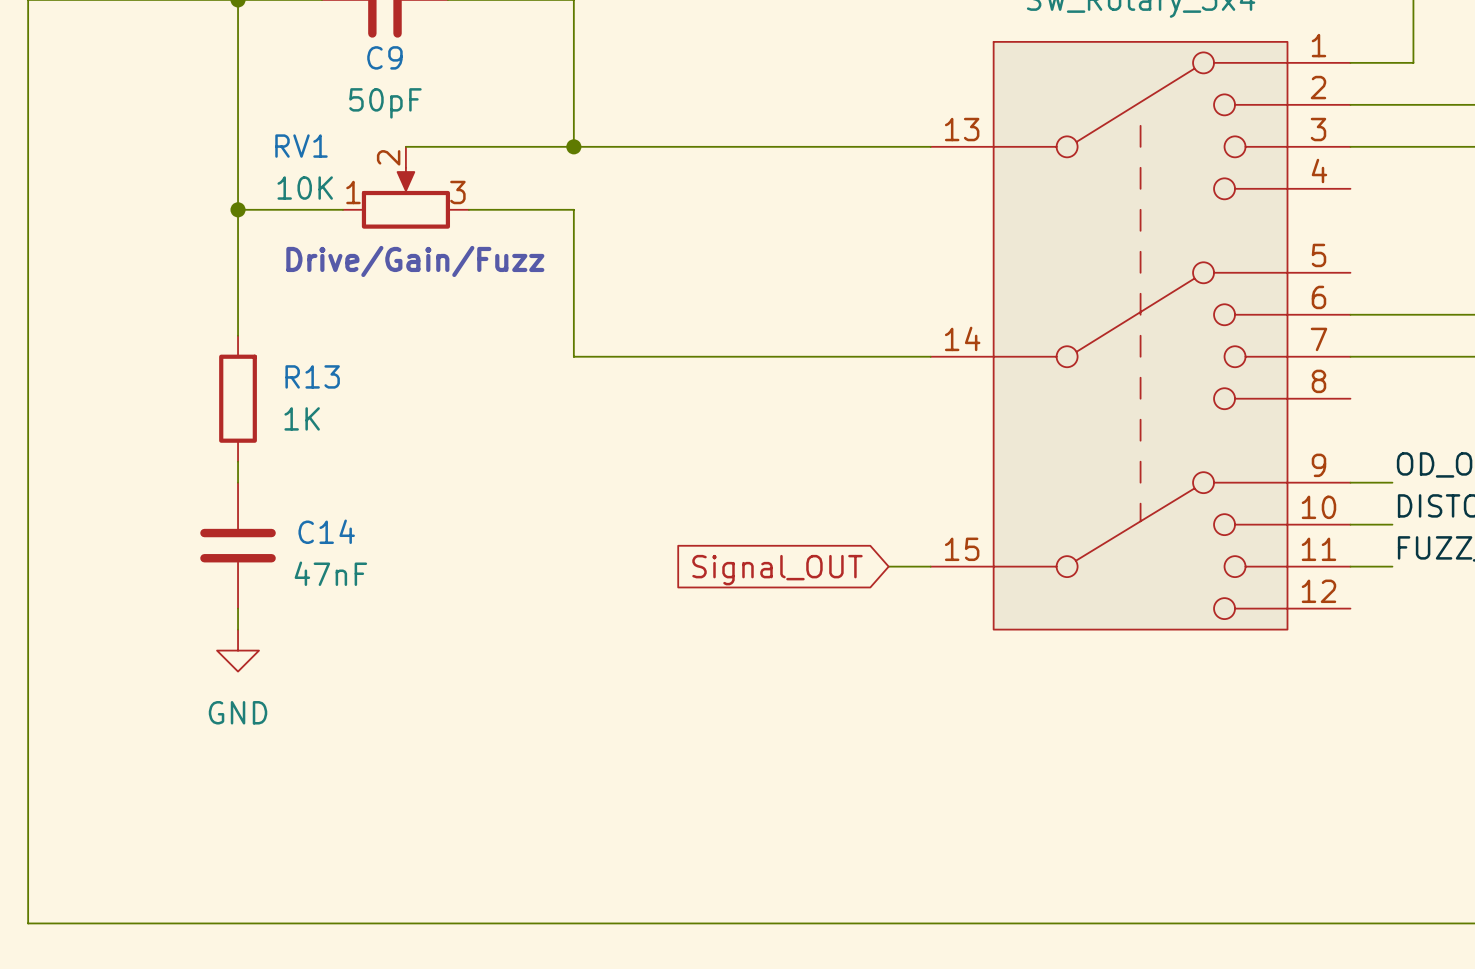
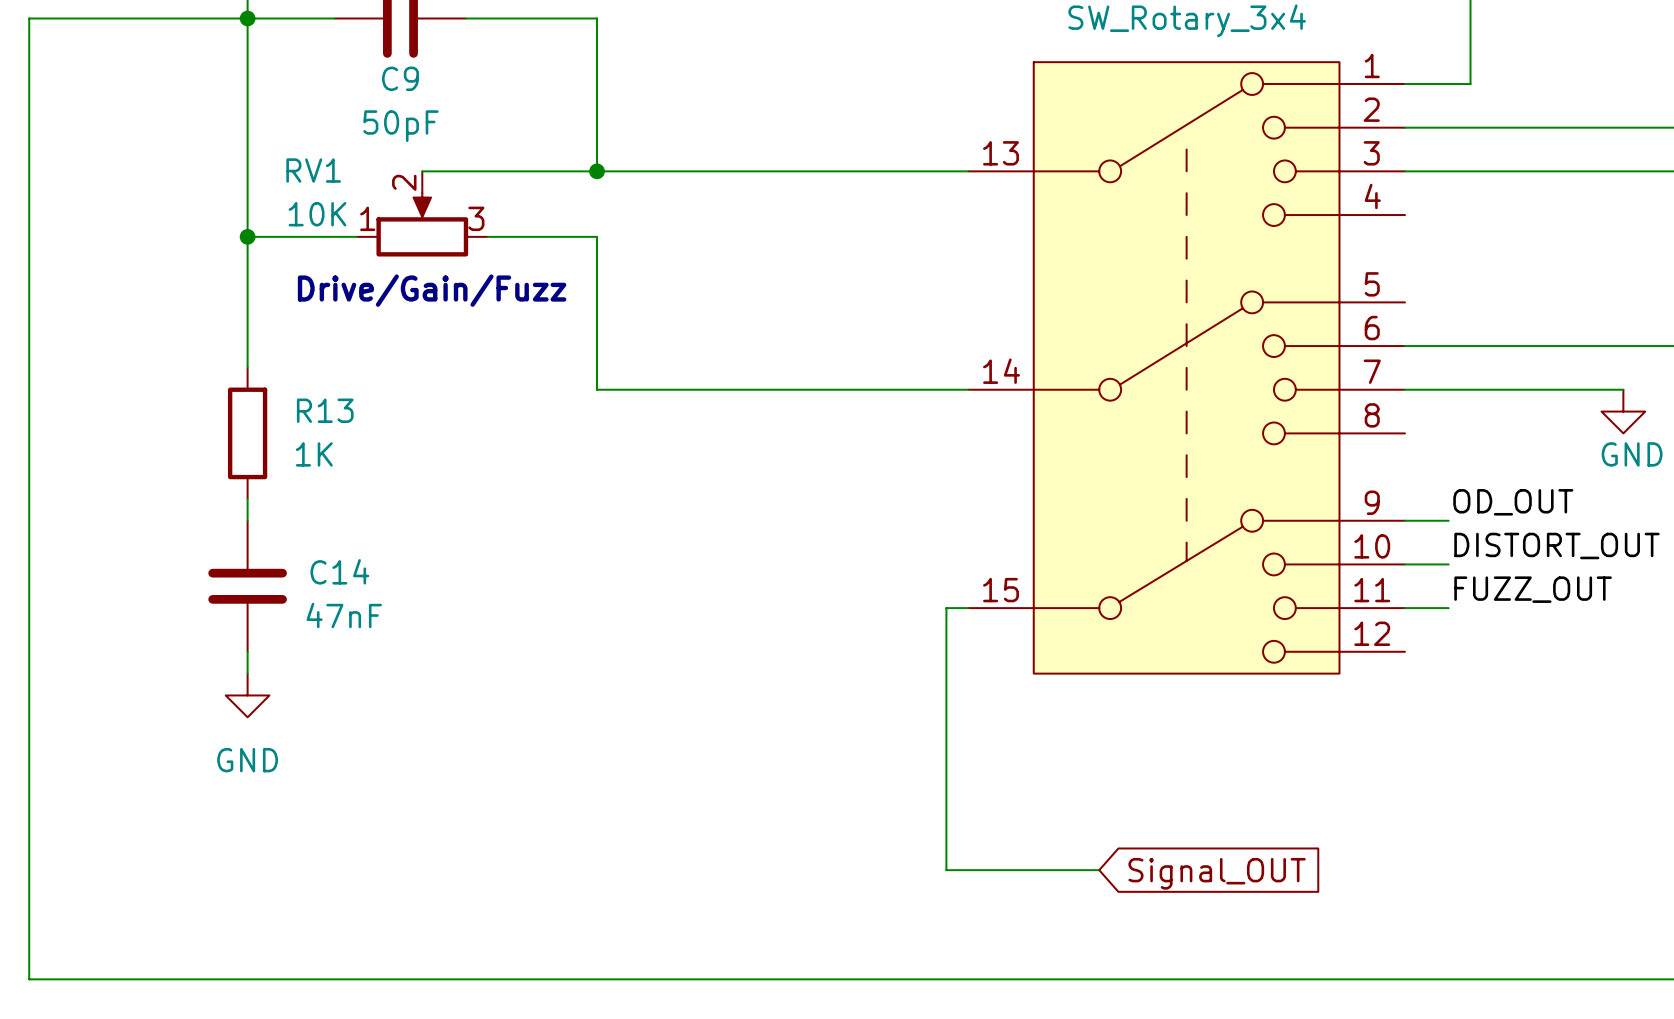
wire: (888, 566) (909, 566) -> (1099, 870) (946, 870) (946, 608)
global label rotation: 0° (777, 570) -> 180° (1217, 873)
global label position: Signal_OUT (777, 570) -> Signal_OUT (1217, 873)

